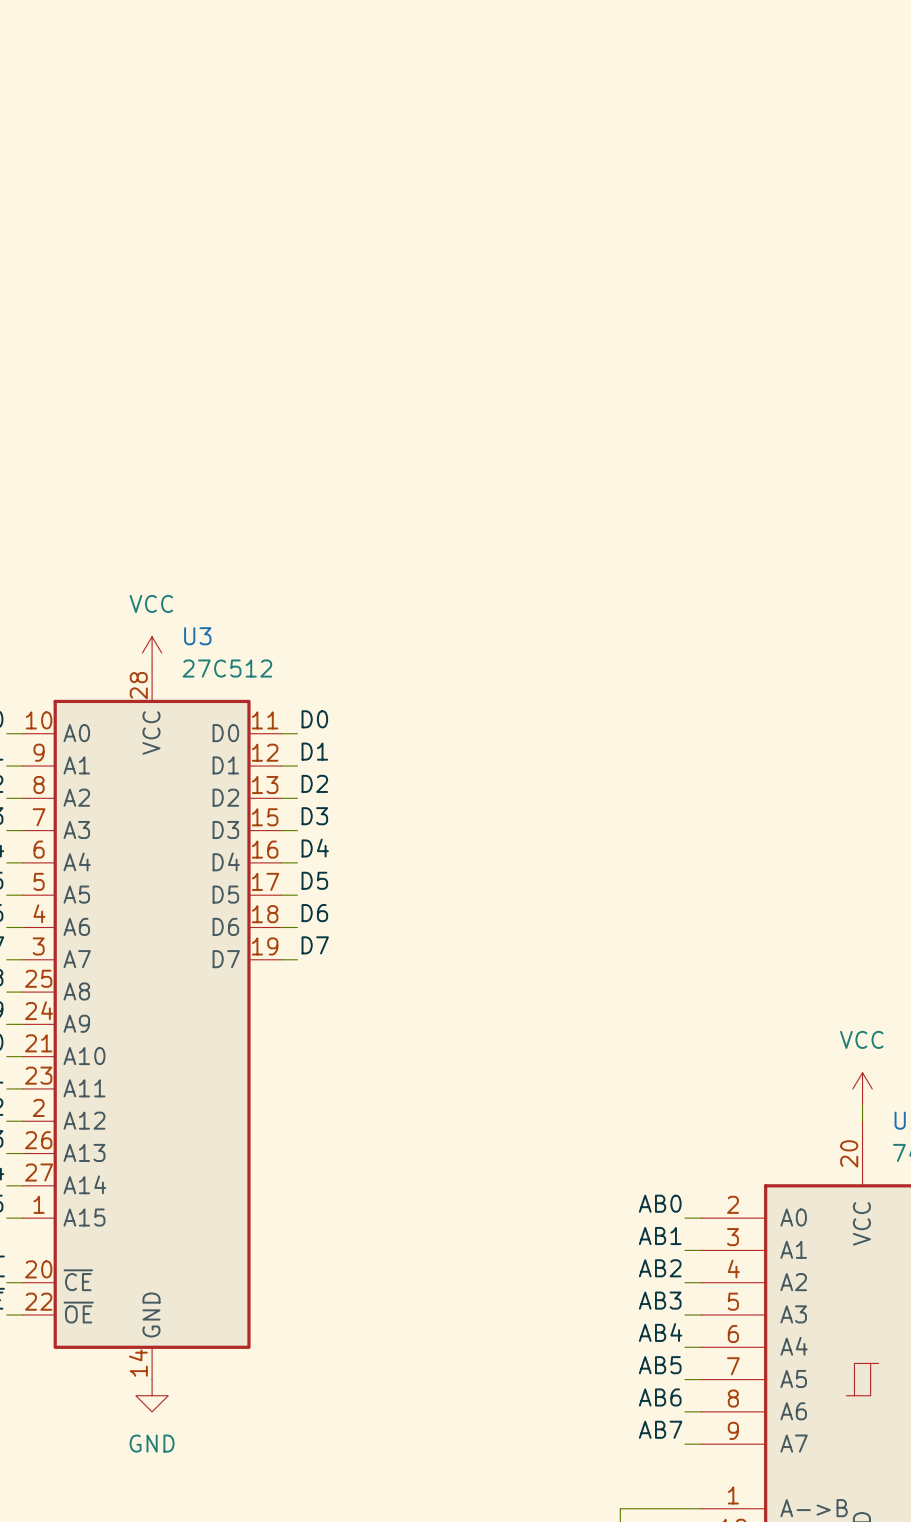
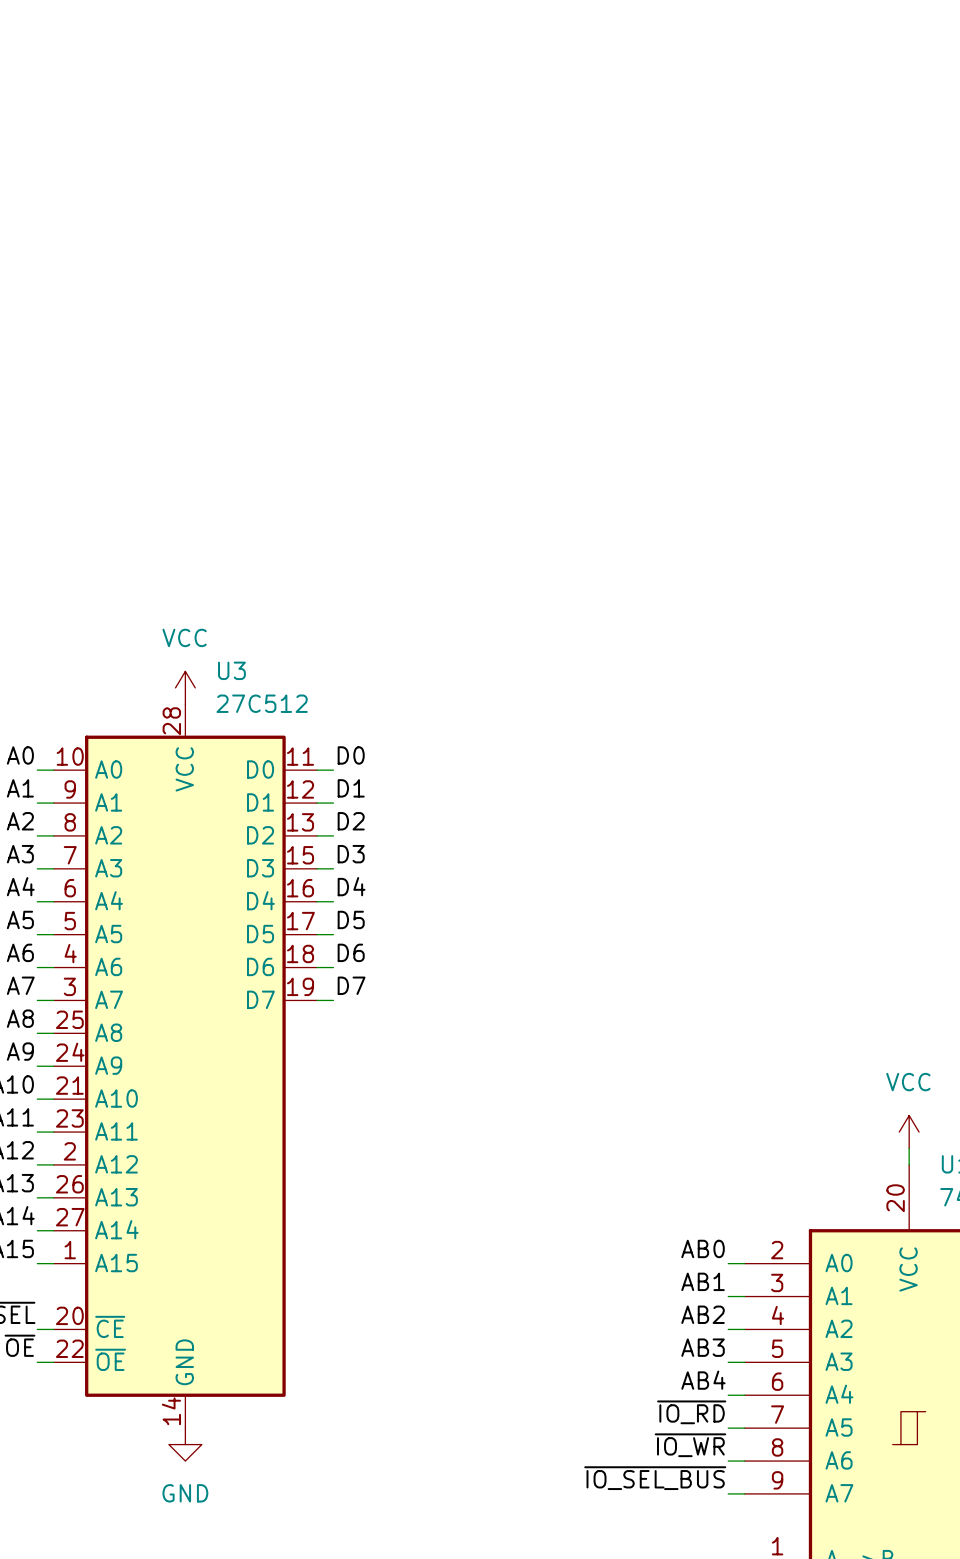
label: AB5 (660, 1365) -> ~{IO_RD} (691, 1412)
label: AB6 (660, 1397) -> ~{IO_WR} (690, 1445)
label: AB7 (660, 1429) -> ~{IO_SEL_BUS} (655, 1478)

